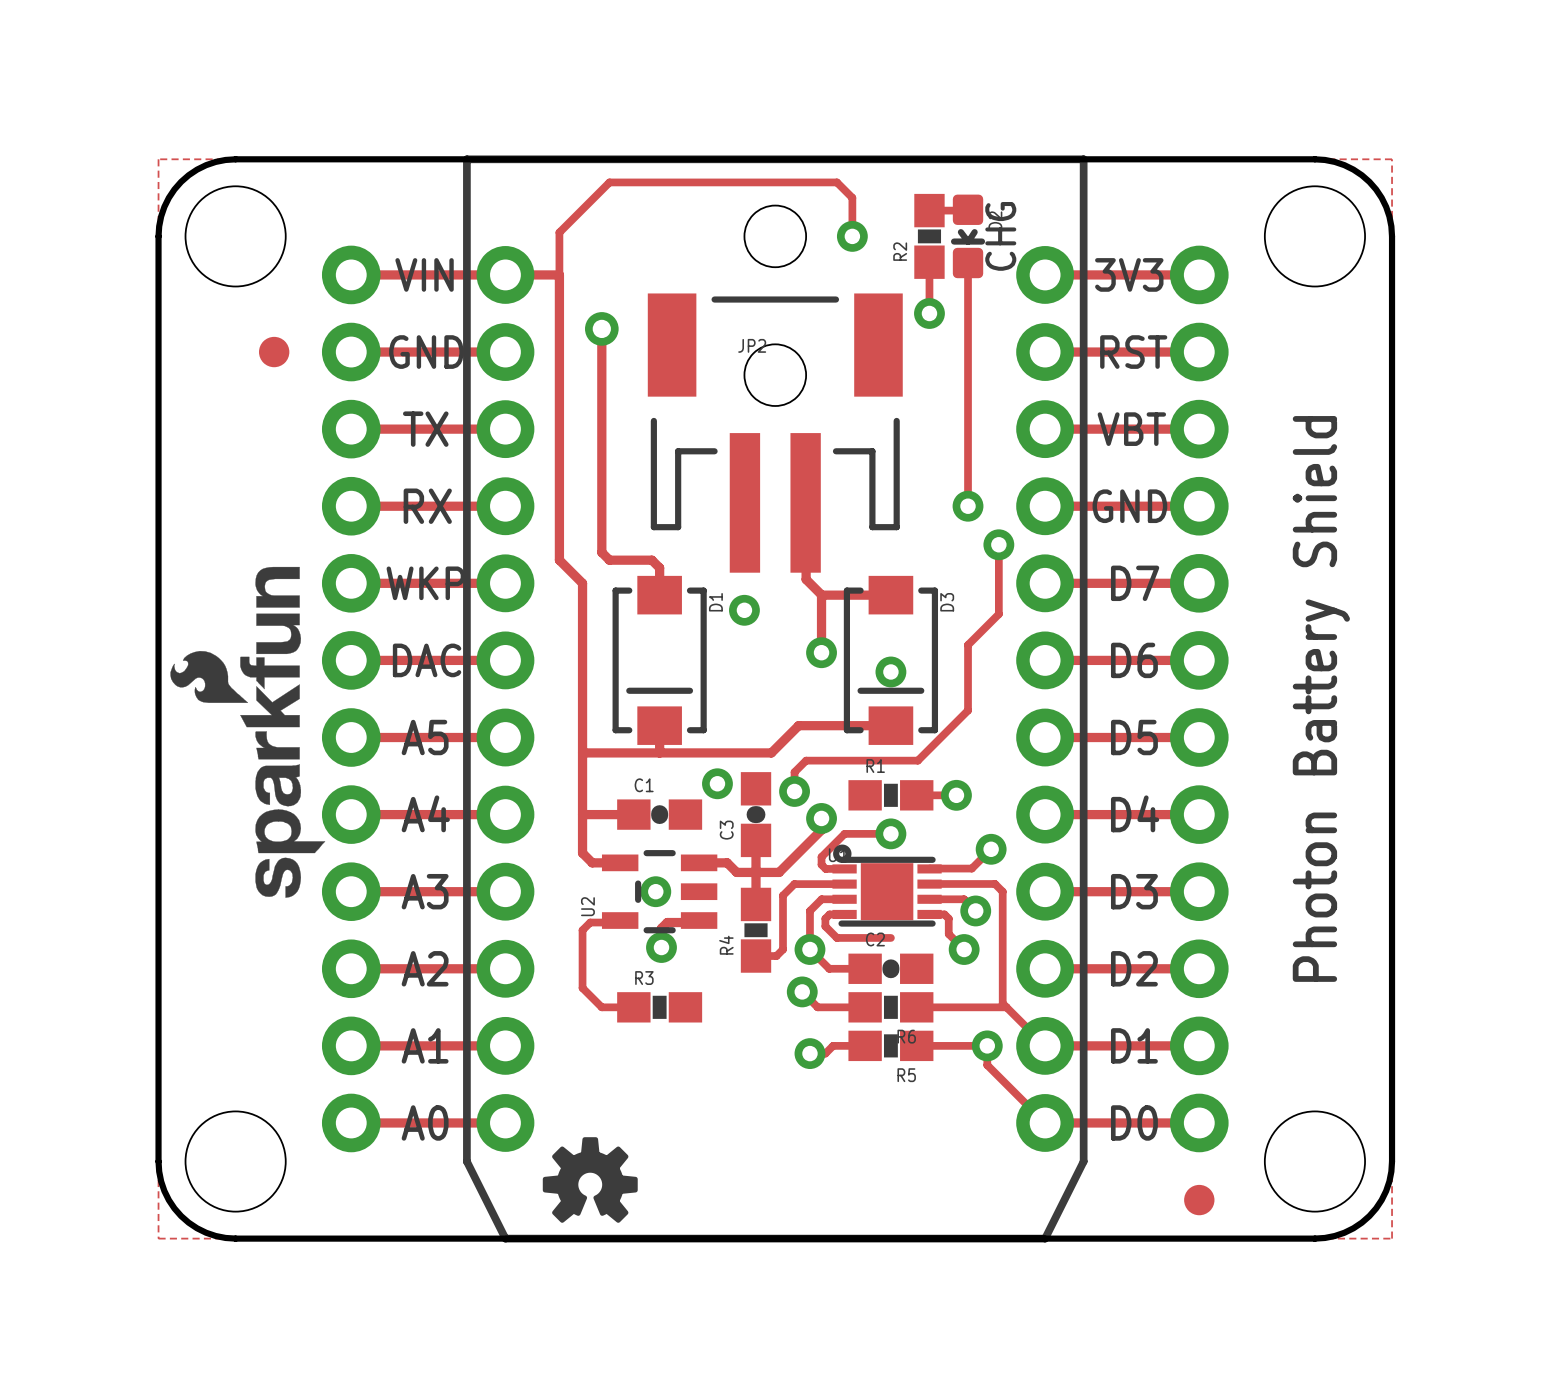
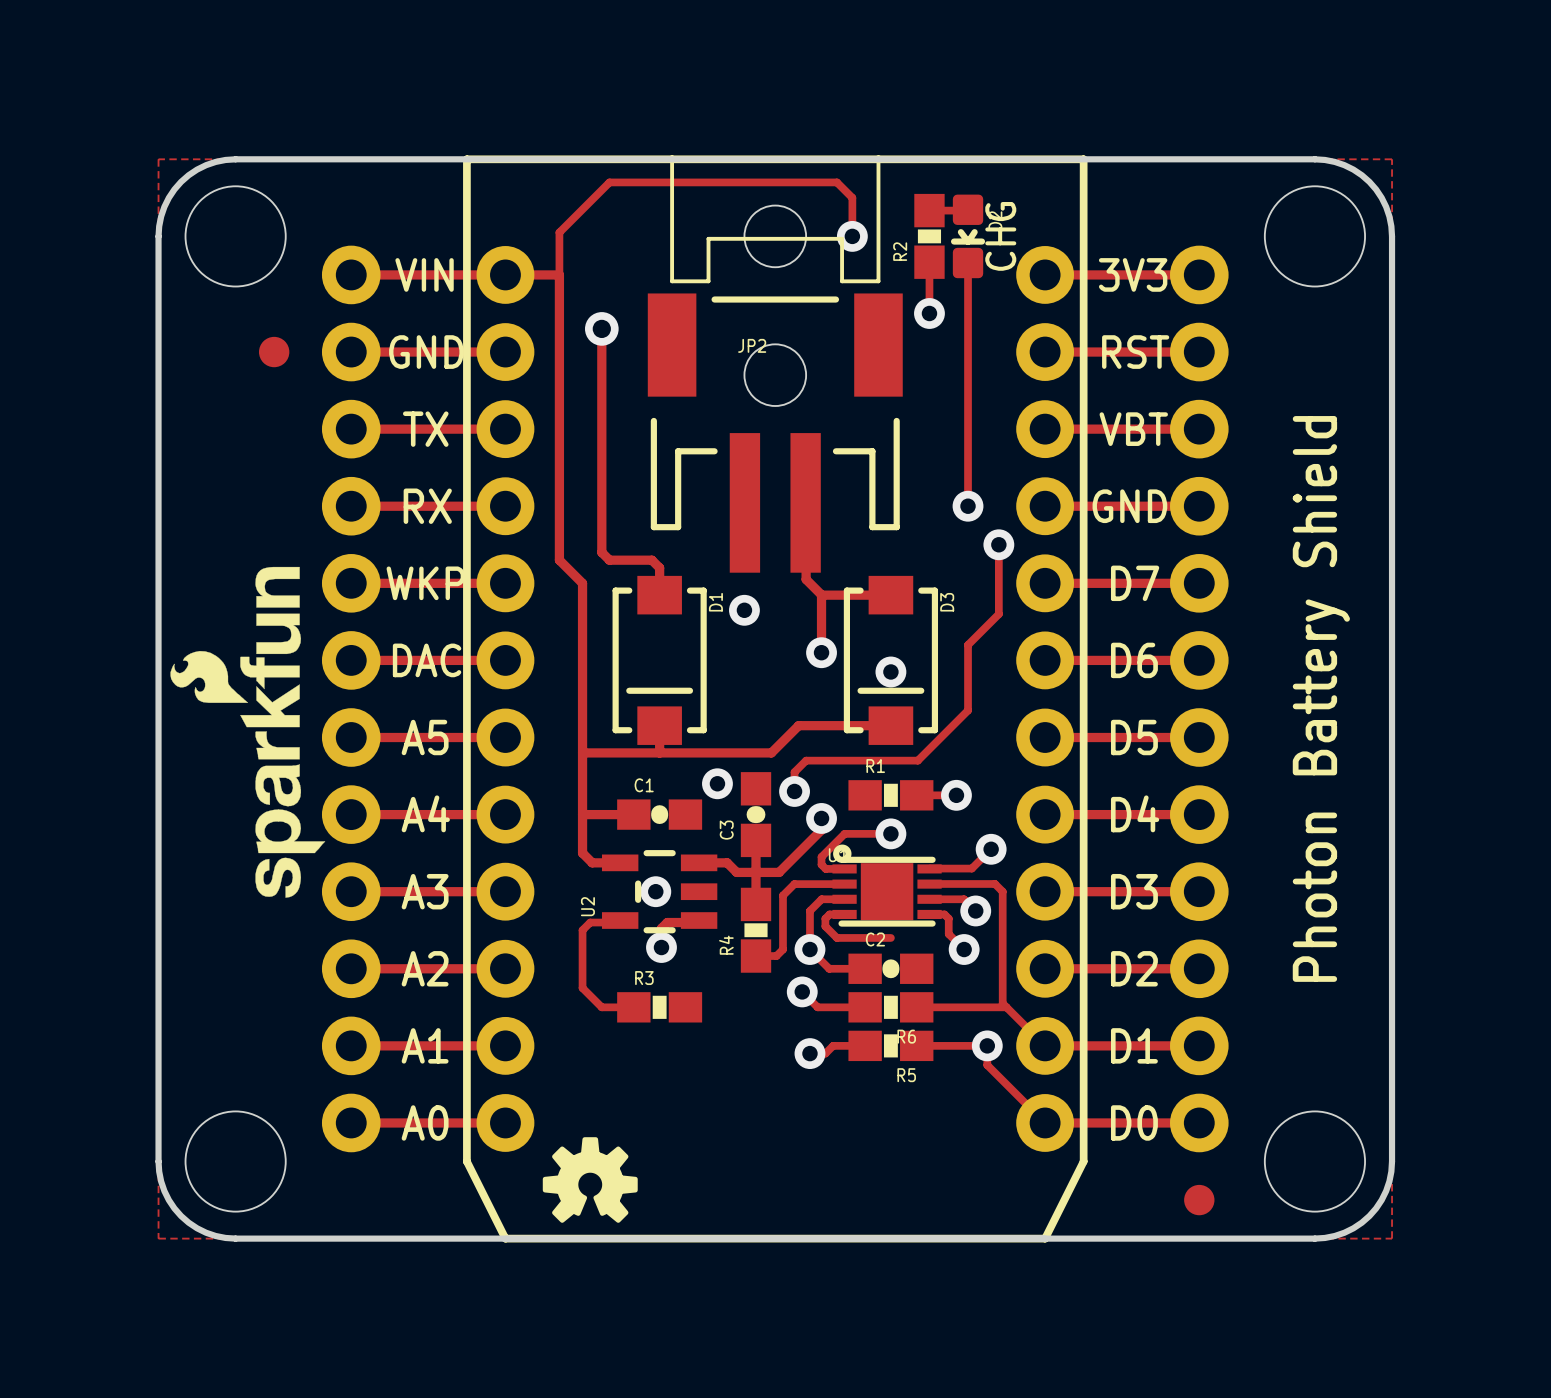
part footprint: [185, 155, 1366, 1243] -> [185, 155, 1366, 1243]

